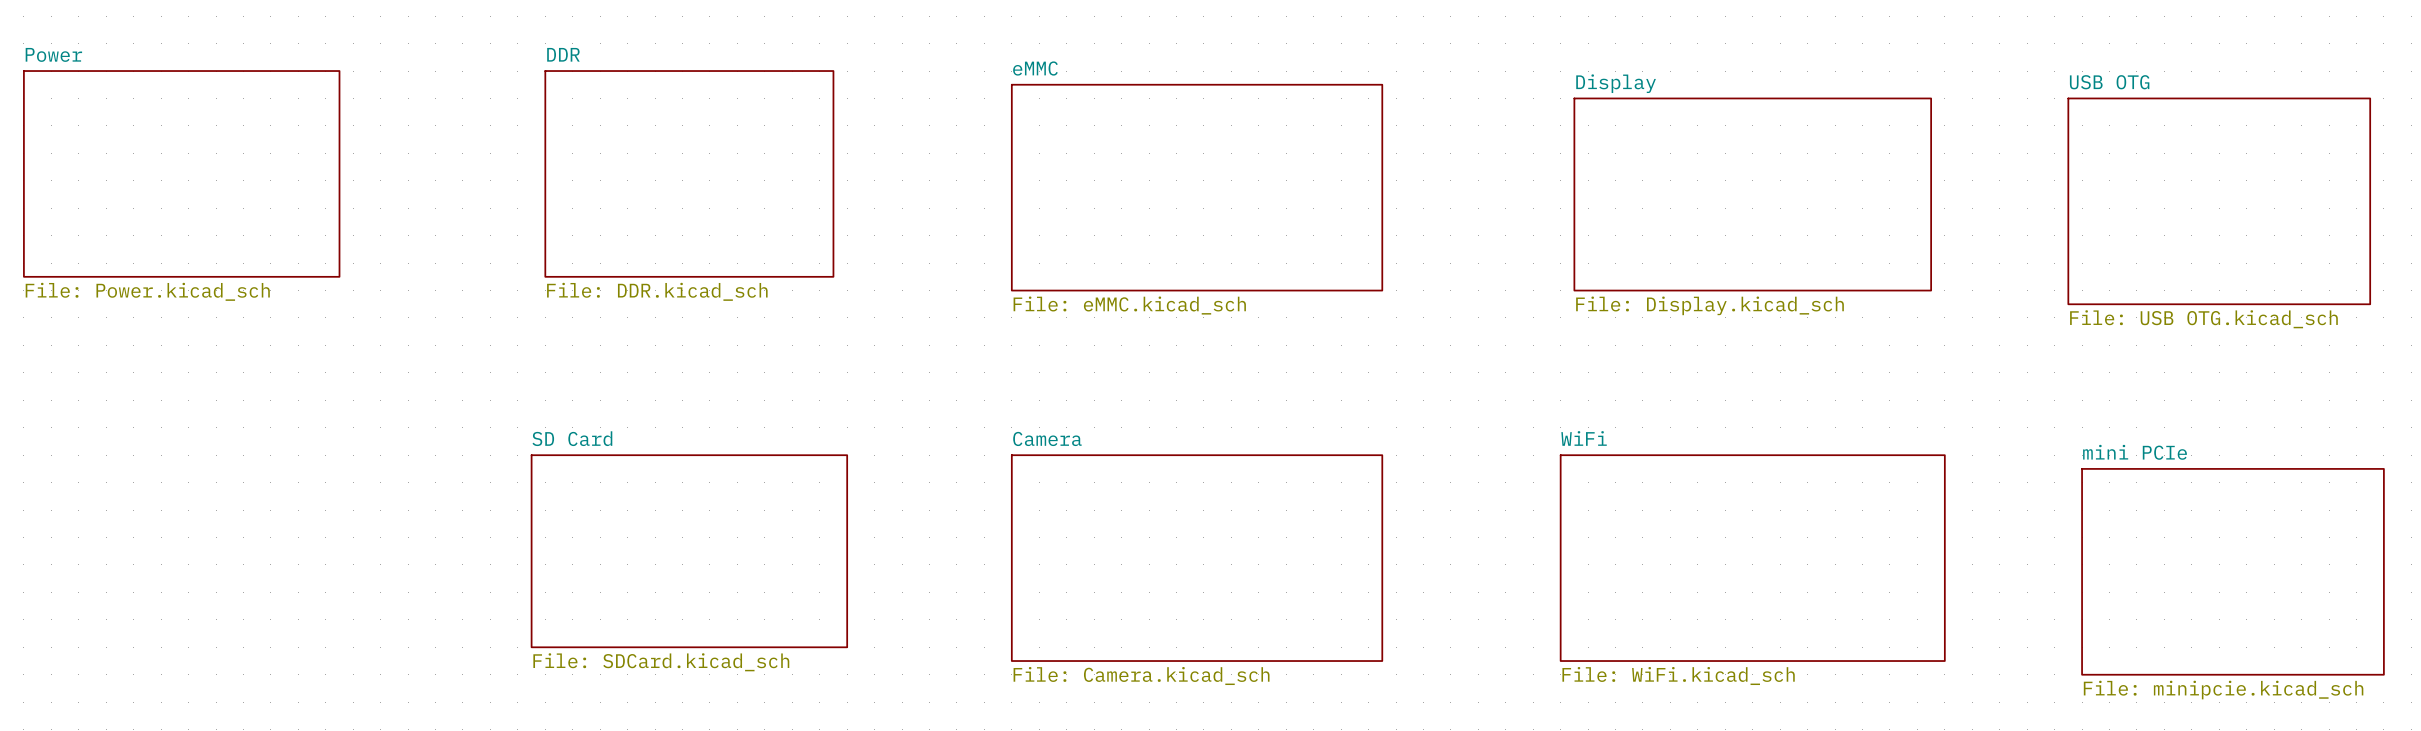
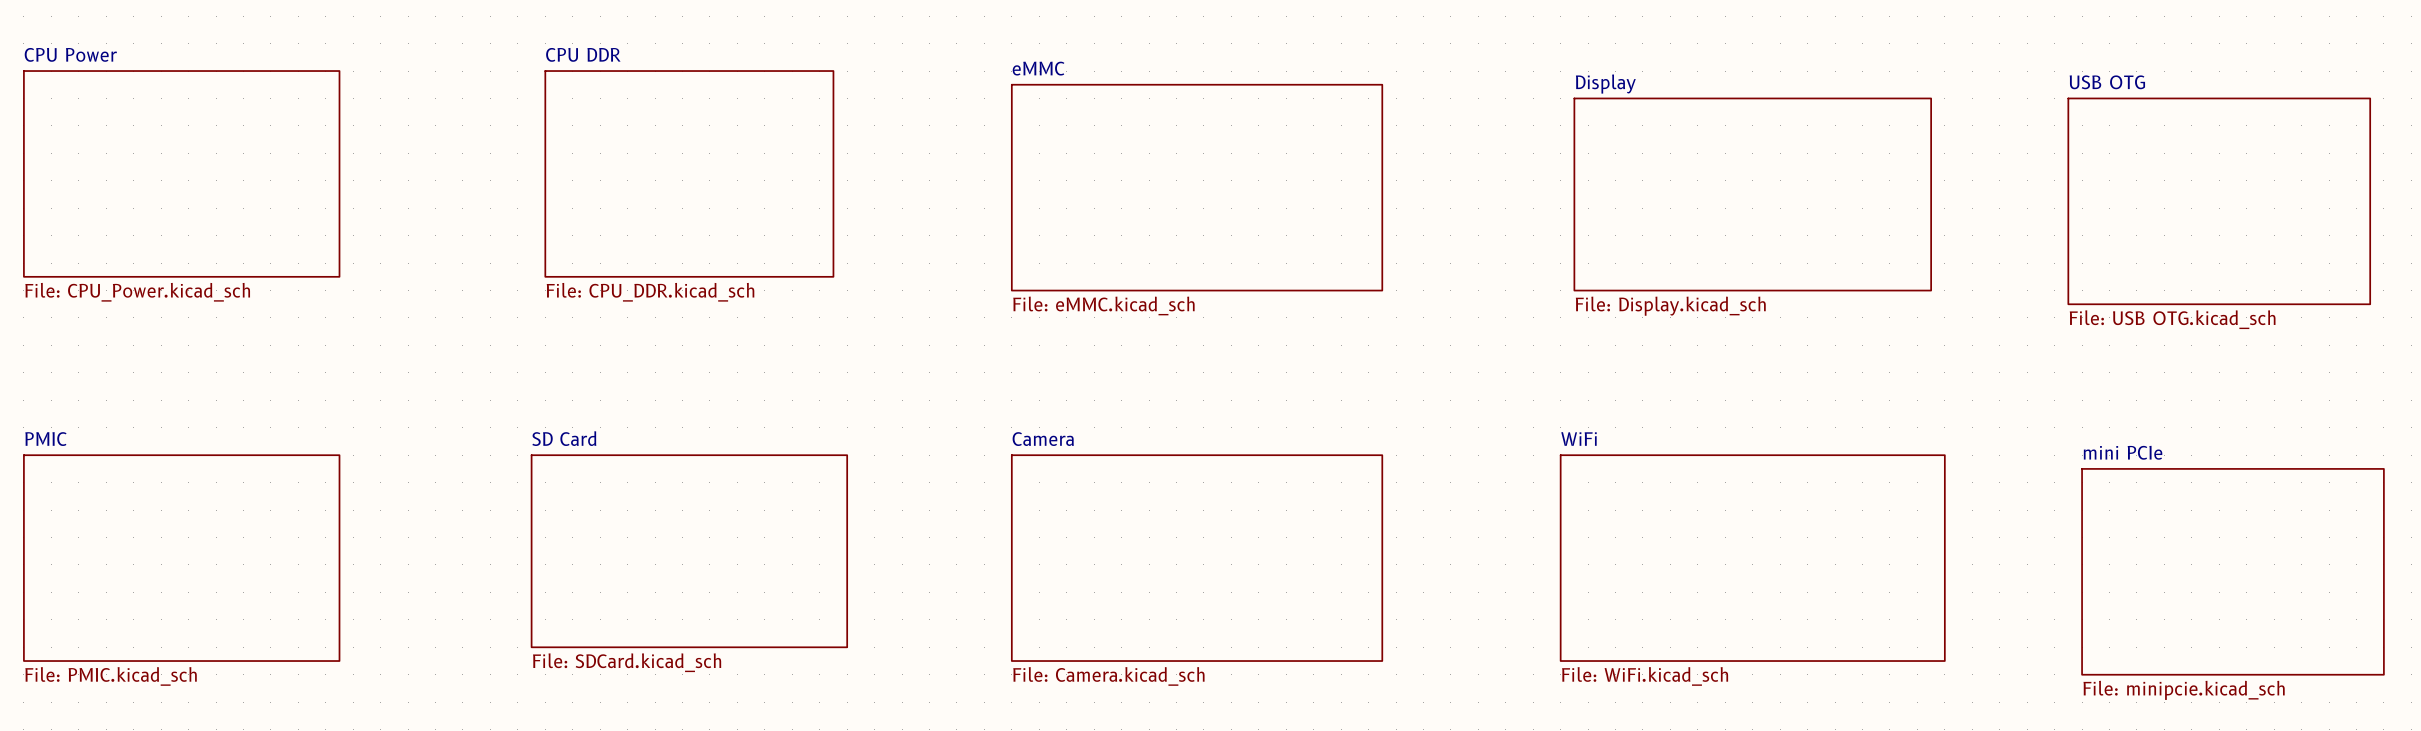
sheet Power name: Power (53, 54) -> CPU Power (70, 54)
sheet DDR name: DDR (563, 54) -> CPU DDR (583, 54)
sheet Power value: File: Power.kicad_sch (147, 291) -> File: CPU_Power.kicad_sch (137, 292)
sheet DDR value: File: DDR.kicad_sch (657, 291) -> File: CPU_DDR.kicad_sch (650, 292)
sheet PMIC: none -> File: PMIC.kicad_sch (181, 558)

